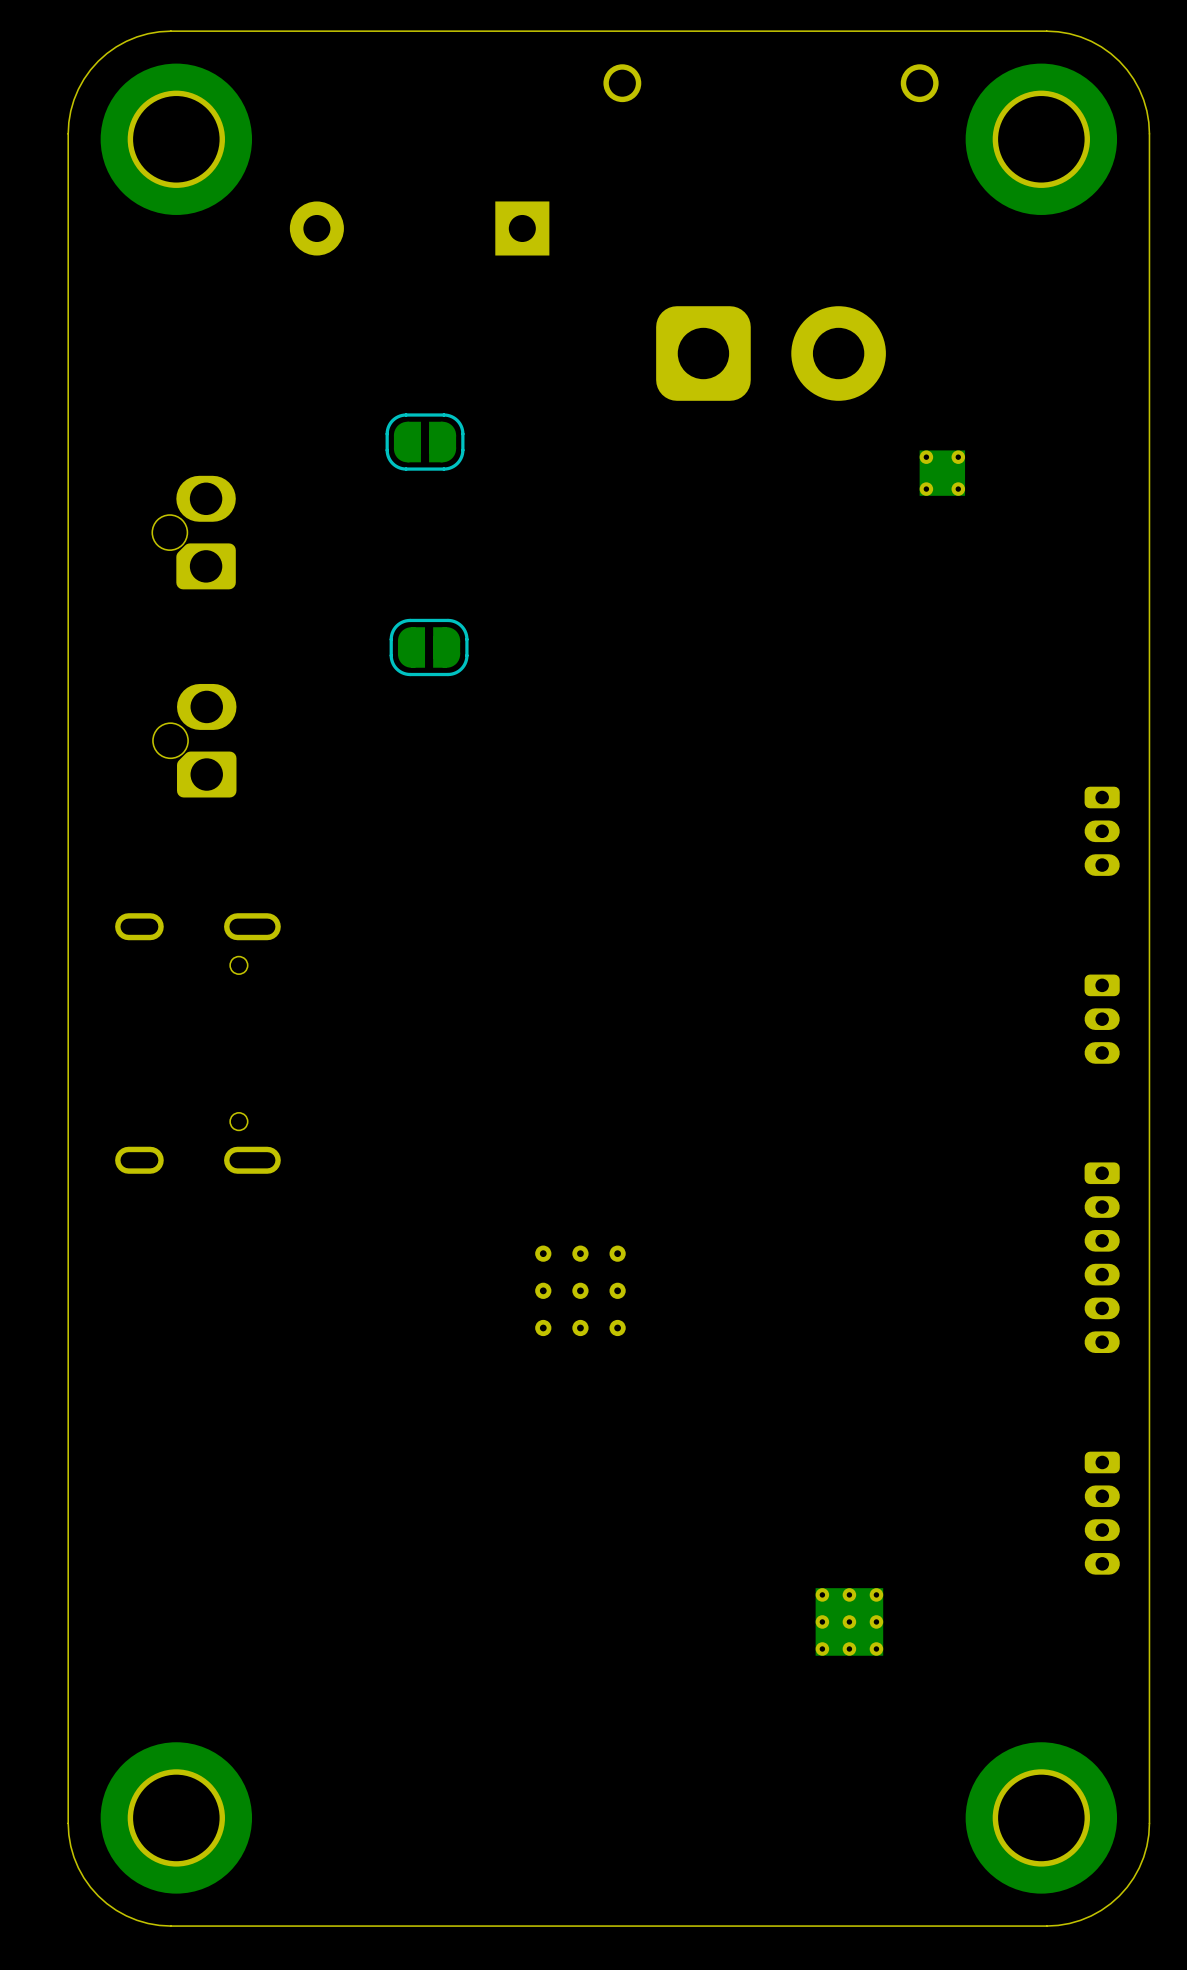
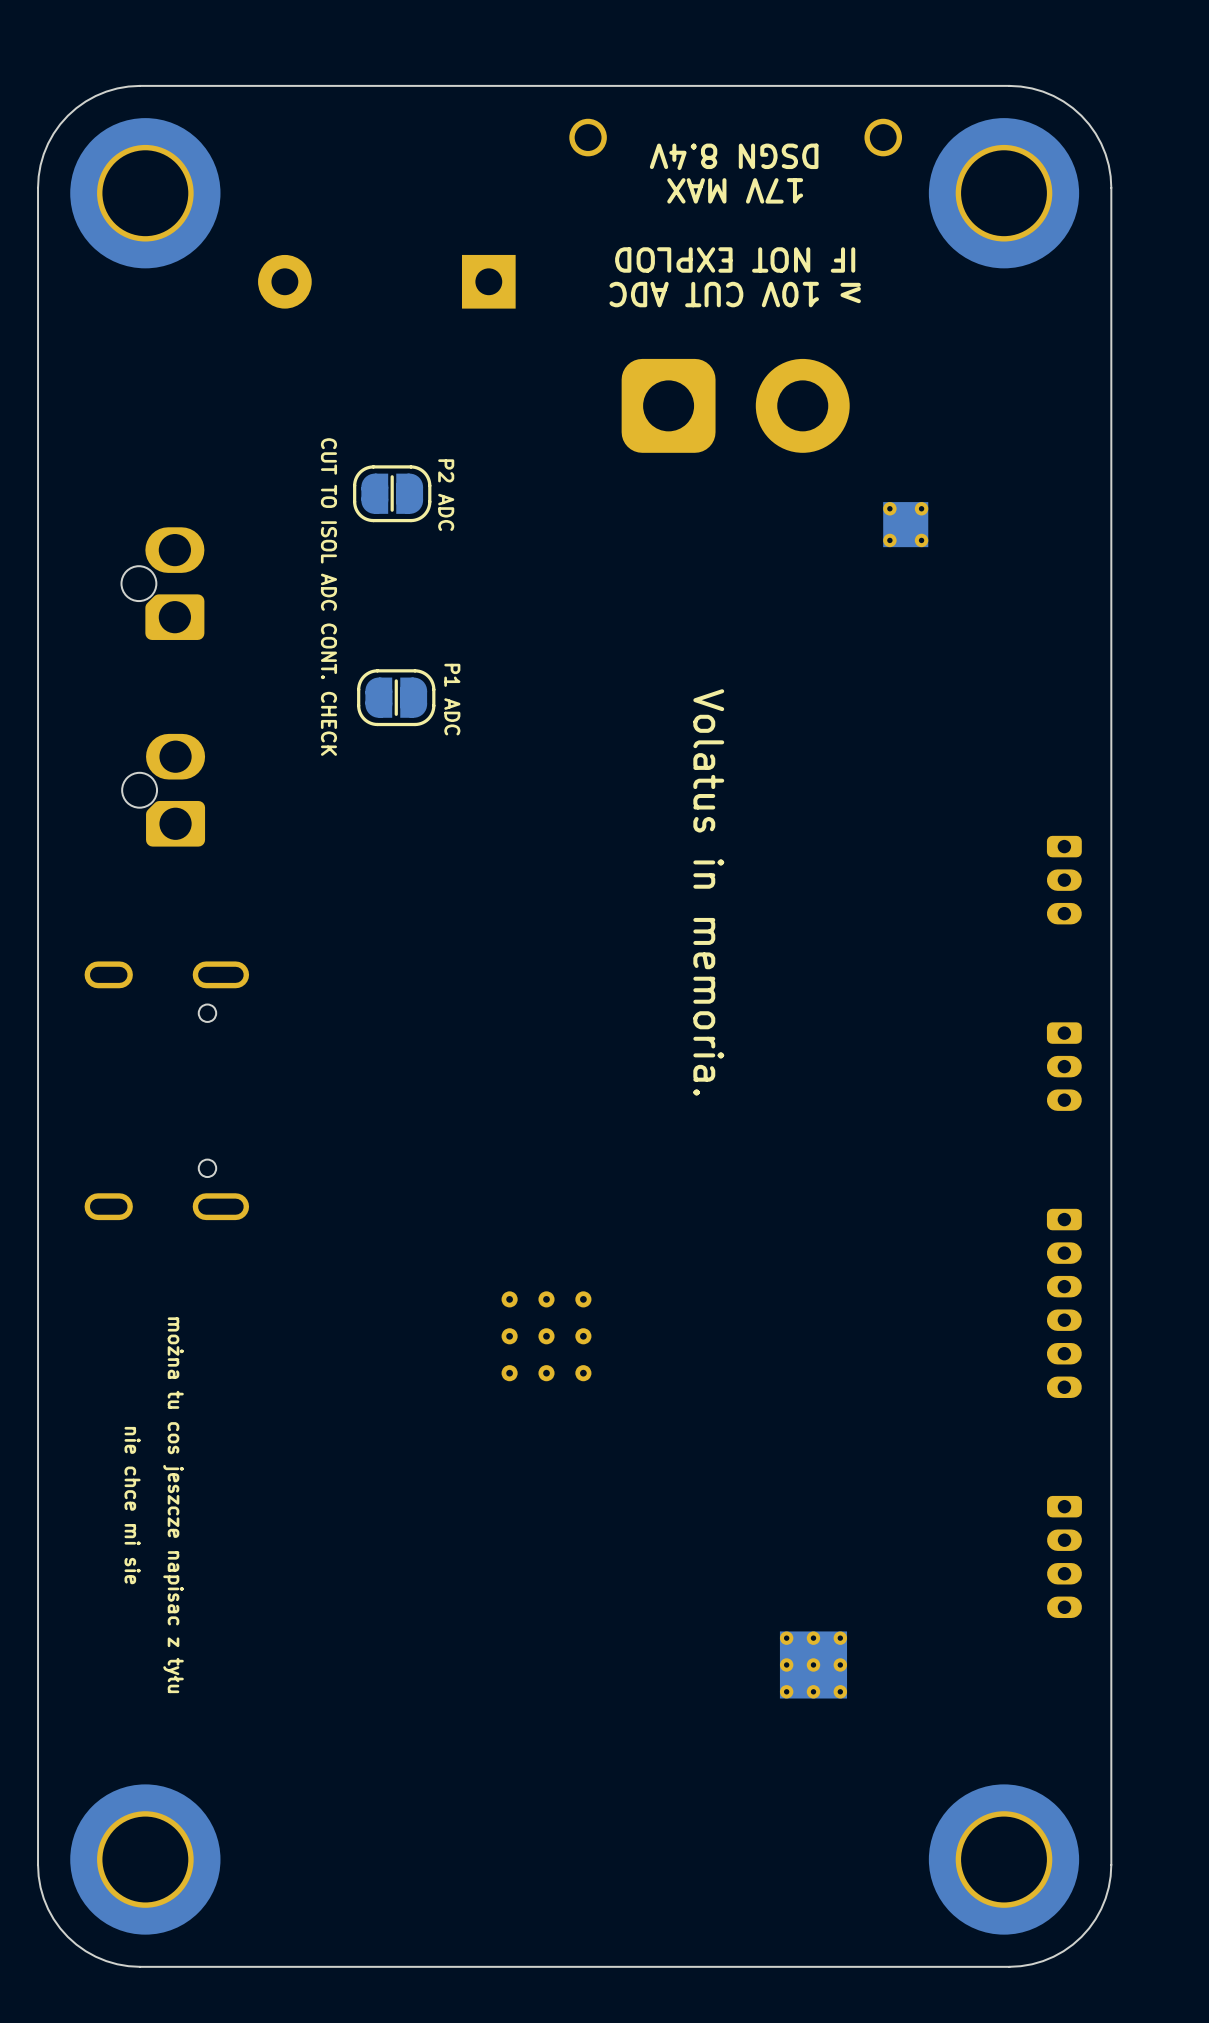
text: none -> DSGN 8.4V (734, 156)
text: none -> 17V MAX (735, 190)
text: none -> IF NOT EXPLOD (735, 259)
text: none -> ≥ 10V CUT ADC (735, 294)
line: none -> (392, 476) (392, 510)
text: none -> P2 ADC (446, 495)
text: none -> CUT TO ISOL ADC CONT. CHECK (328, 597)
line: none -> (396, 680) (396, 714)
text: none -> P1 ADC (452, 699)
text: none -> Volatus in memoria. (708, 892)
text: none -> nie chce mi sie (132, 1505)
text: none -> można tu cos jeszcze napisac z tyłu (173, 1505)

